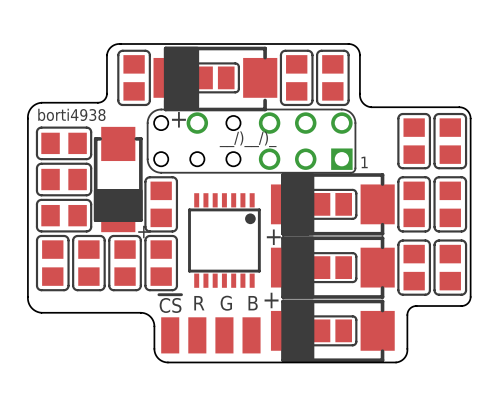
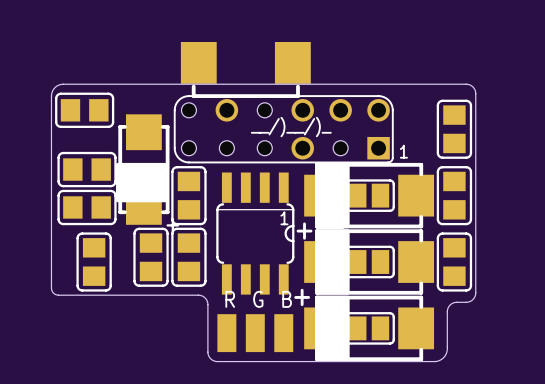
drawing: [163, 46, 200, 110] -> none
line: (165, 57) (165, 48) (265, 48) (265, 57) -> none
part: (134, 77) -> none
part: (215, 77) -> none
part: (296, 77) -> none
part: (332, 77) -> none
part footprint: [146, 108, 357, 174] -> [173, 95, 394, 164]
text: borti4938 (71, 114) -> none
text: + (178, 119) -> none
part: (450, 141) -> none
part position: (64, 143) -> (84, 110)
drawing shape: [93, 189, 143, 222] -> [115, 162, 168, 203]
part footprint: [188, 193, 261, 288] -> [216, 172, 295, 295]
part: (450, 204) -> none
text: none -> 1 (284, 218)
part: (52, 263) -> none
part: (88, 263) -> none
part: none -> (94, 262)
part: (450, 267) -> none
line: (158, 294) (181, 294) -> none
board edge: (425, 306) (462, 305) (467, 303) (470, 299) (470, 118) (466, 109) (459, 107) (366, 105) (360, 96) (359, 52) (356, 47) (350, 44) (117, 44) (110, 47) (107, 53) (106, 94) (103, 100) (97, 102) (39, 102) (32, 106) (28, 112) (28, 300) (32, 309) (41, 312) (146, 313) (153, 322) (154, 350) (157, 357) (166, 362) (188, 362) -> (466, 302) (472, 299) (475, 292) (475, 93) (471, 85) (63, 84) (57, 85) (53, 90) (51, 96) (52, 291) (58, 295) (202, 295) (207, 303) (208, 354) (211, 359) (217, 361)
CS: (170, 335) -> none

